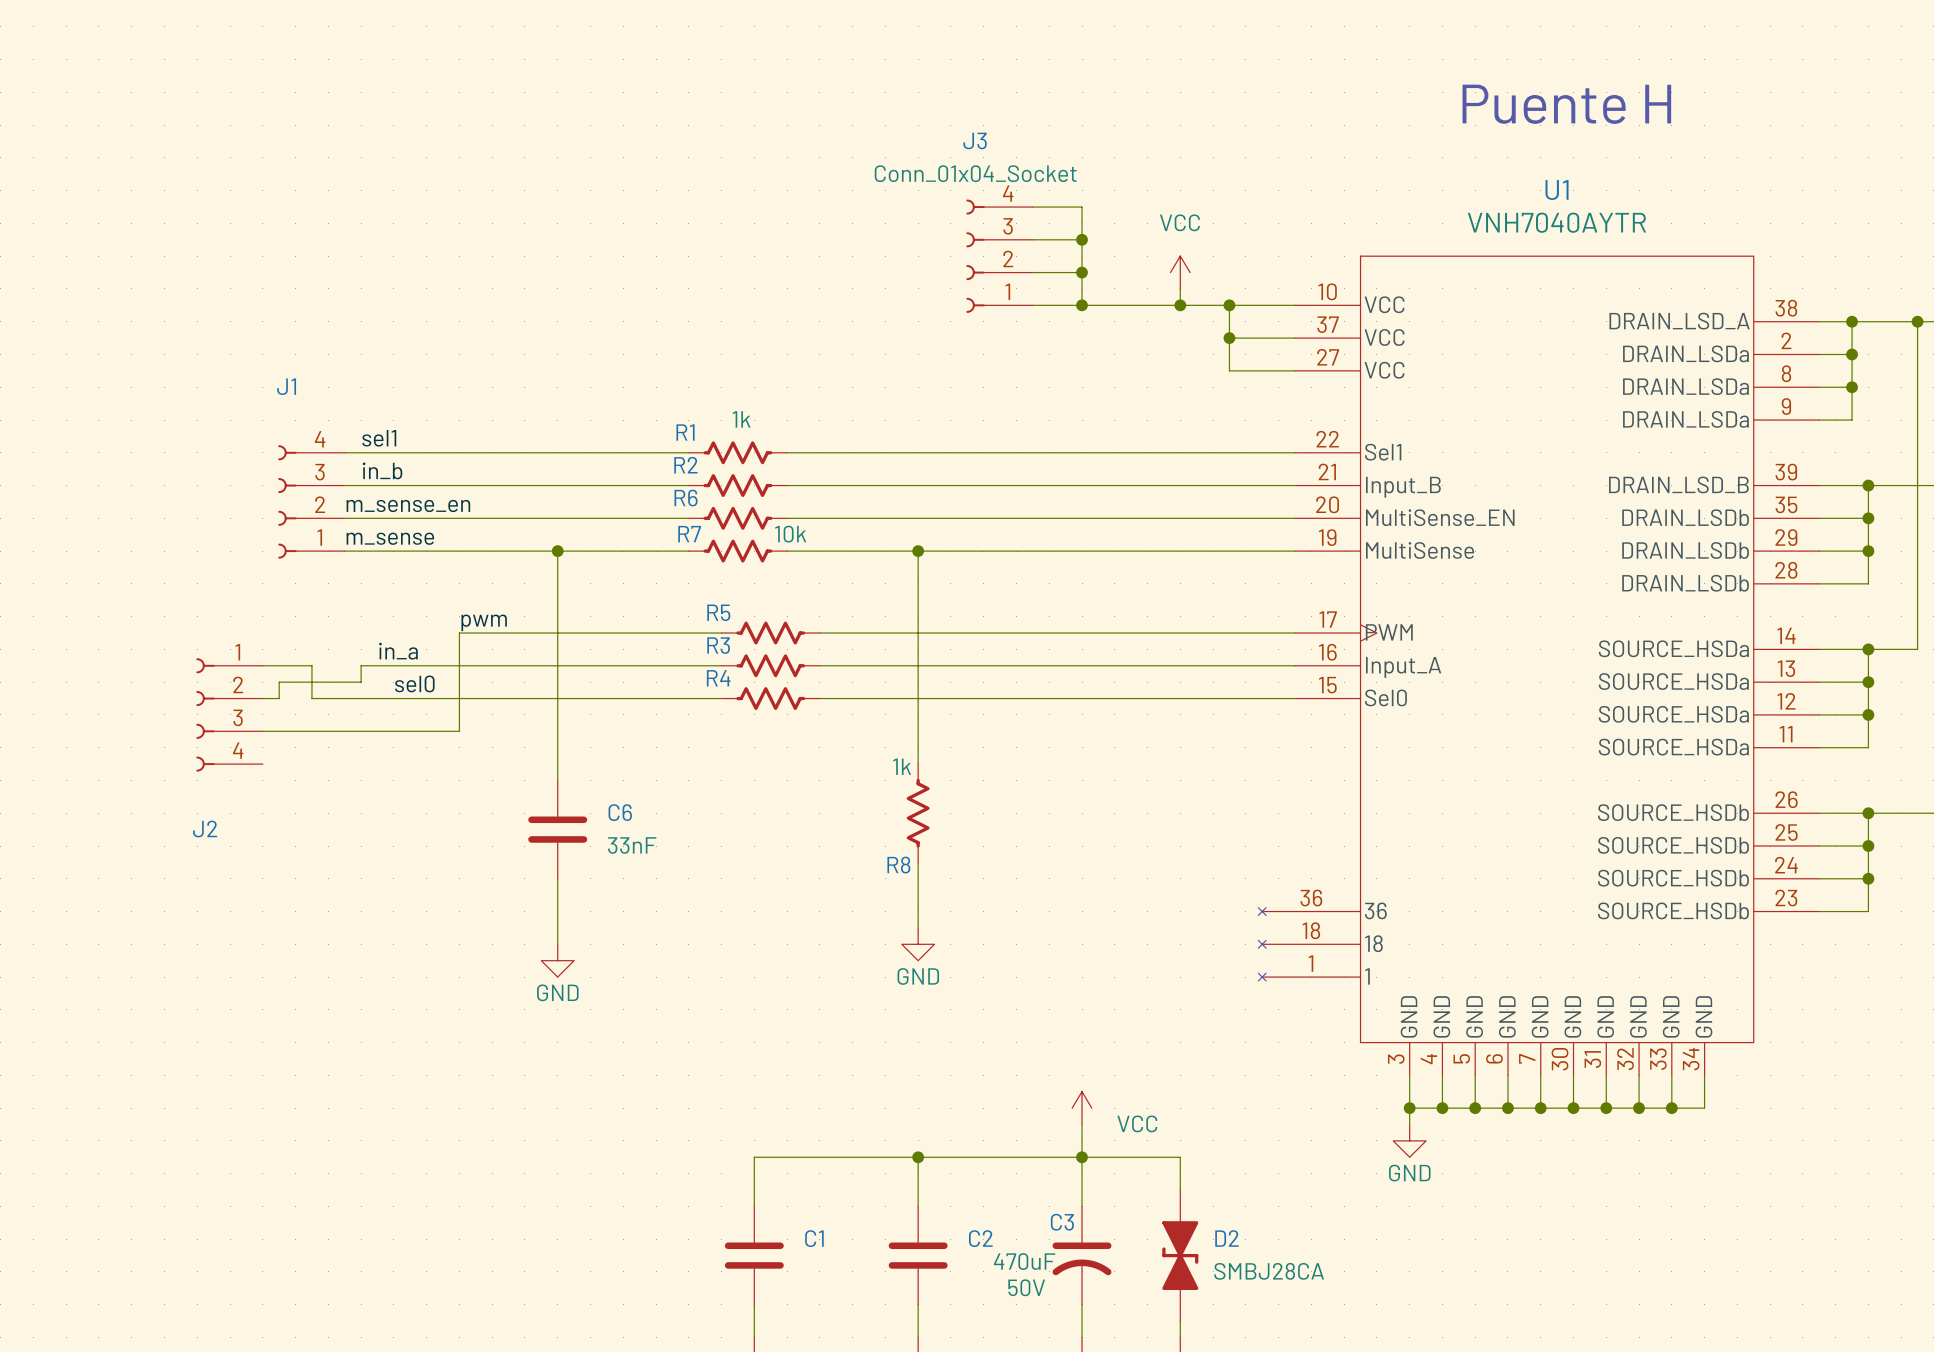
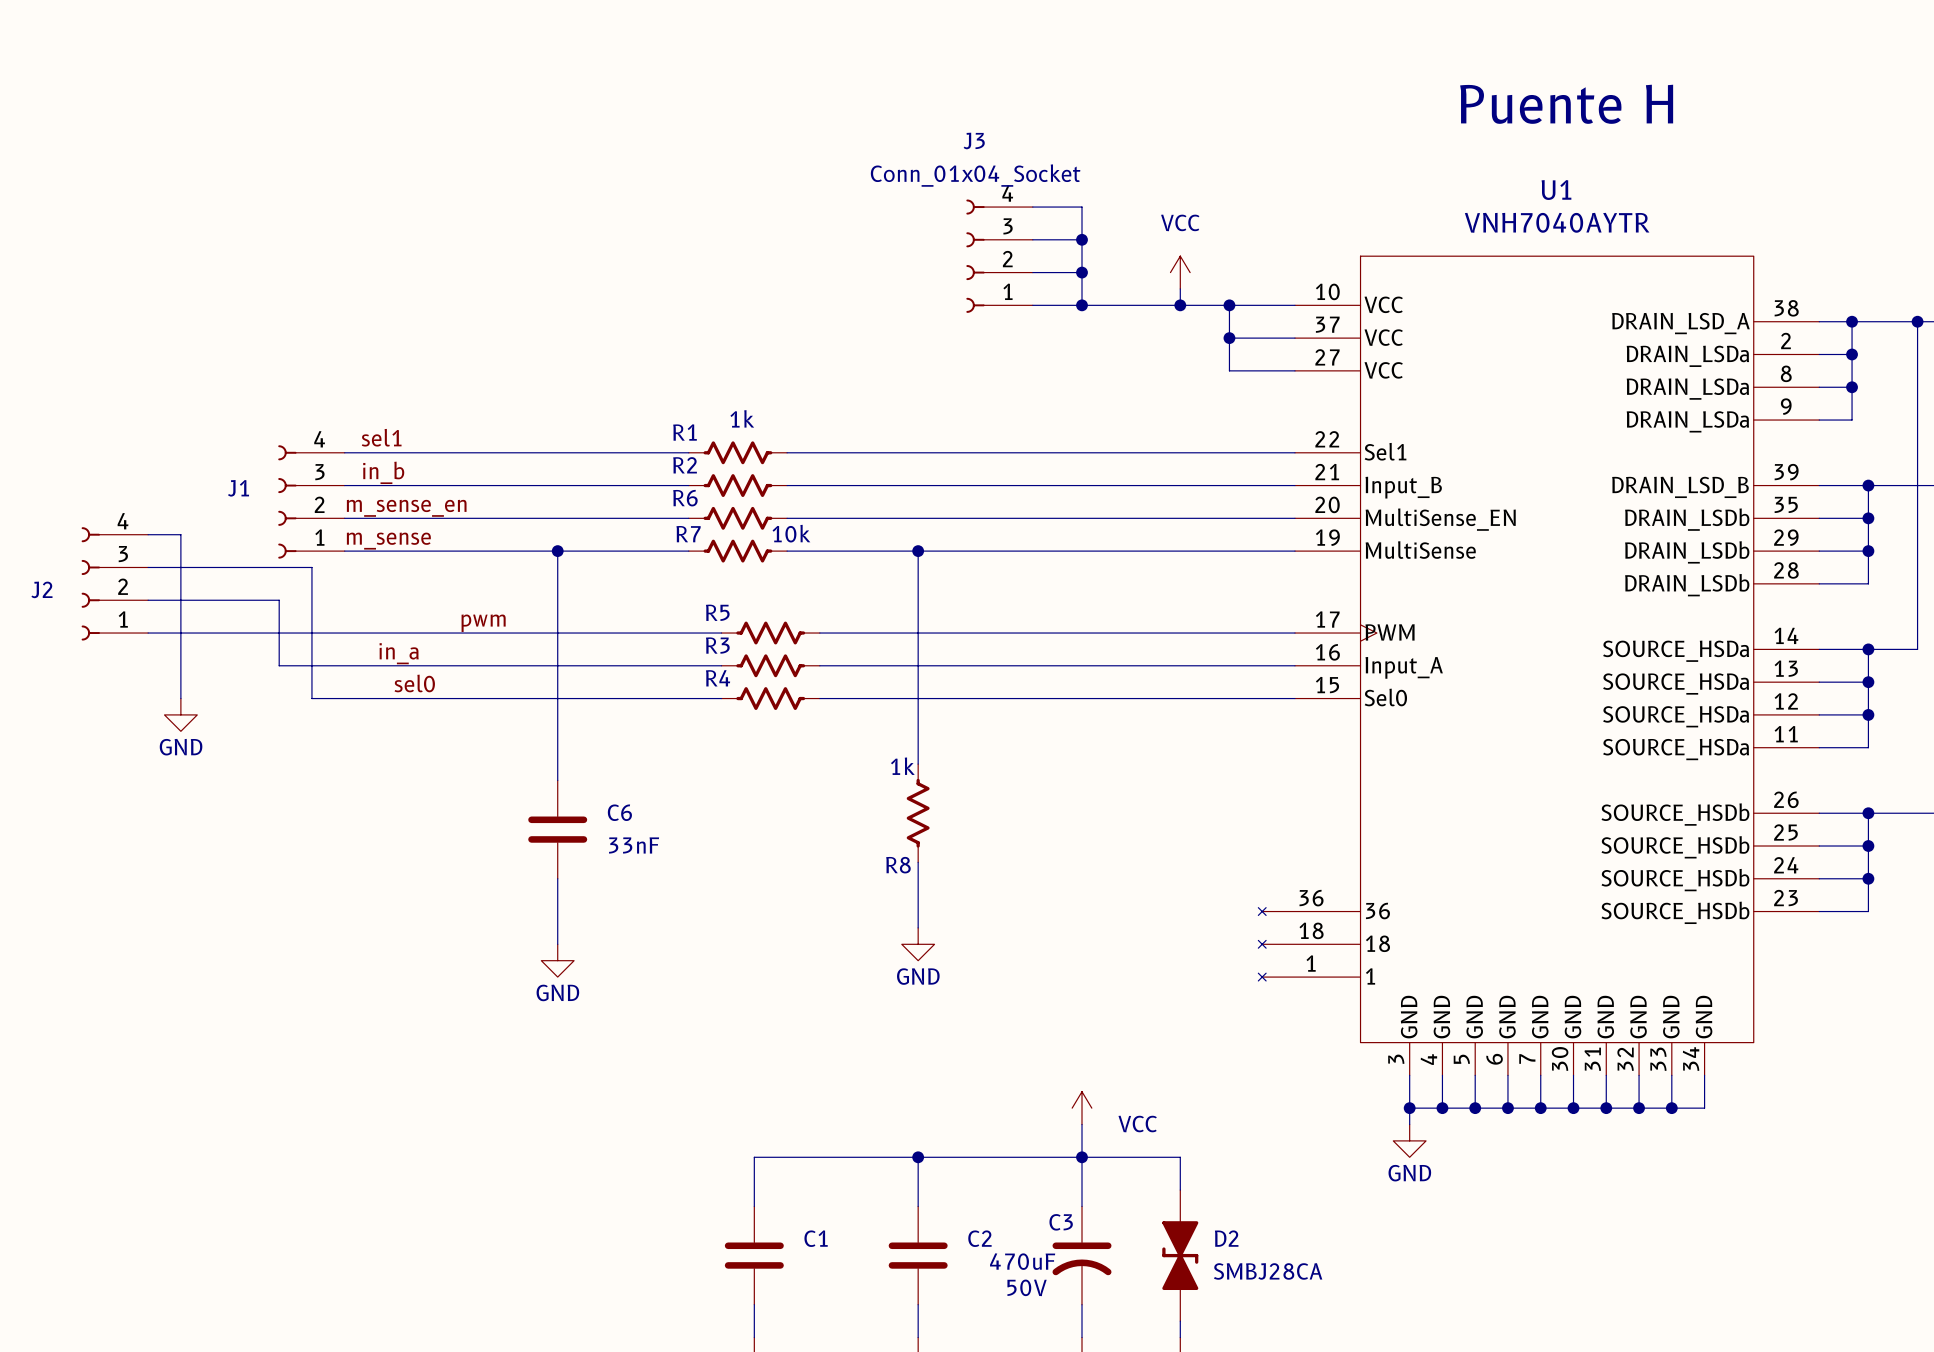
J1 name position: J1 (286, 386) -> J1 (238, 488)
wire: none -> (148, 534) (180, 534) (180, 698)
wire: (459, 633) (459, 731) (262, 731) -> (459, 633) (148, 633)
wire: (262, 665) (279, 665) -> (148, 600) (279, 600) (279, 665)
wire: (361, 665) (361, 682) (279, 682) (279, 698) (262, 698) -> (361, 665) (311, 665) (311, 567) (148, 567)
power symbol: none -> GND (180, 714)
J2 flip: as is (205, 714) -> up-down (90, 583)
J2 position: (229, 714) -> (114, 583)
J2 name position: J2 (205, 829) -> J2 (41, 589)

